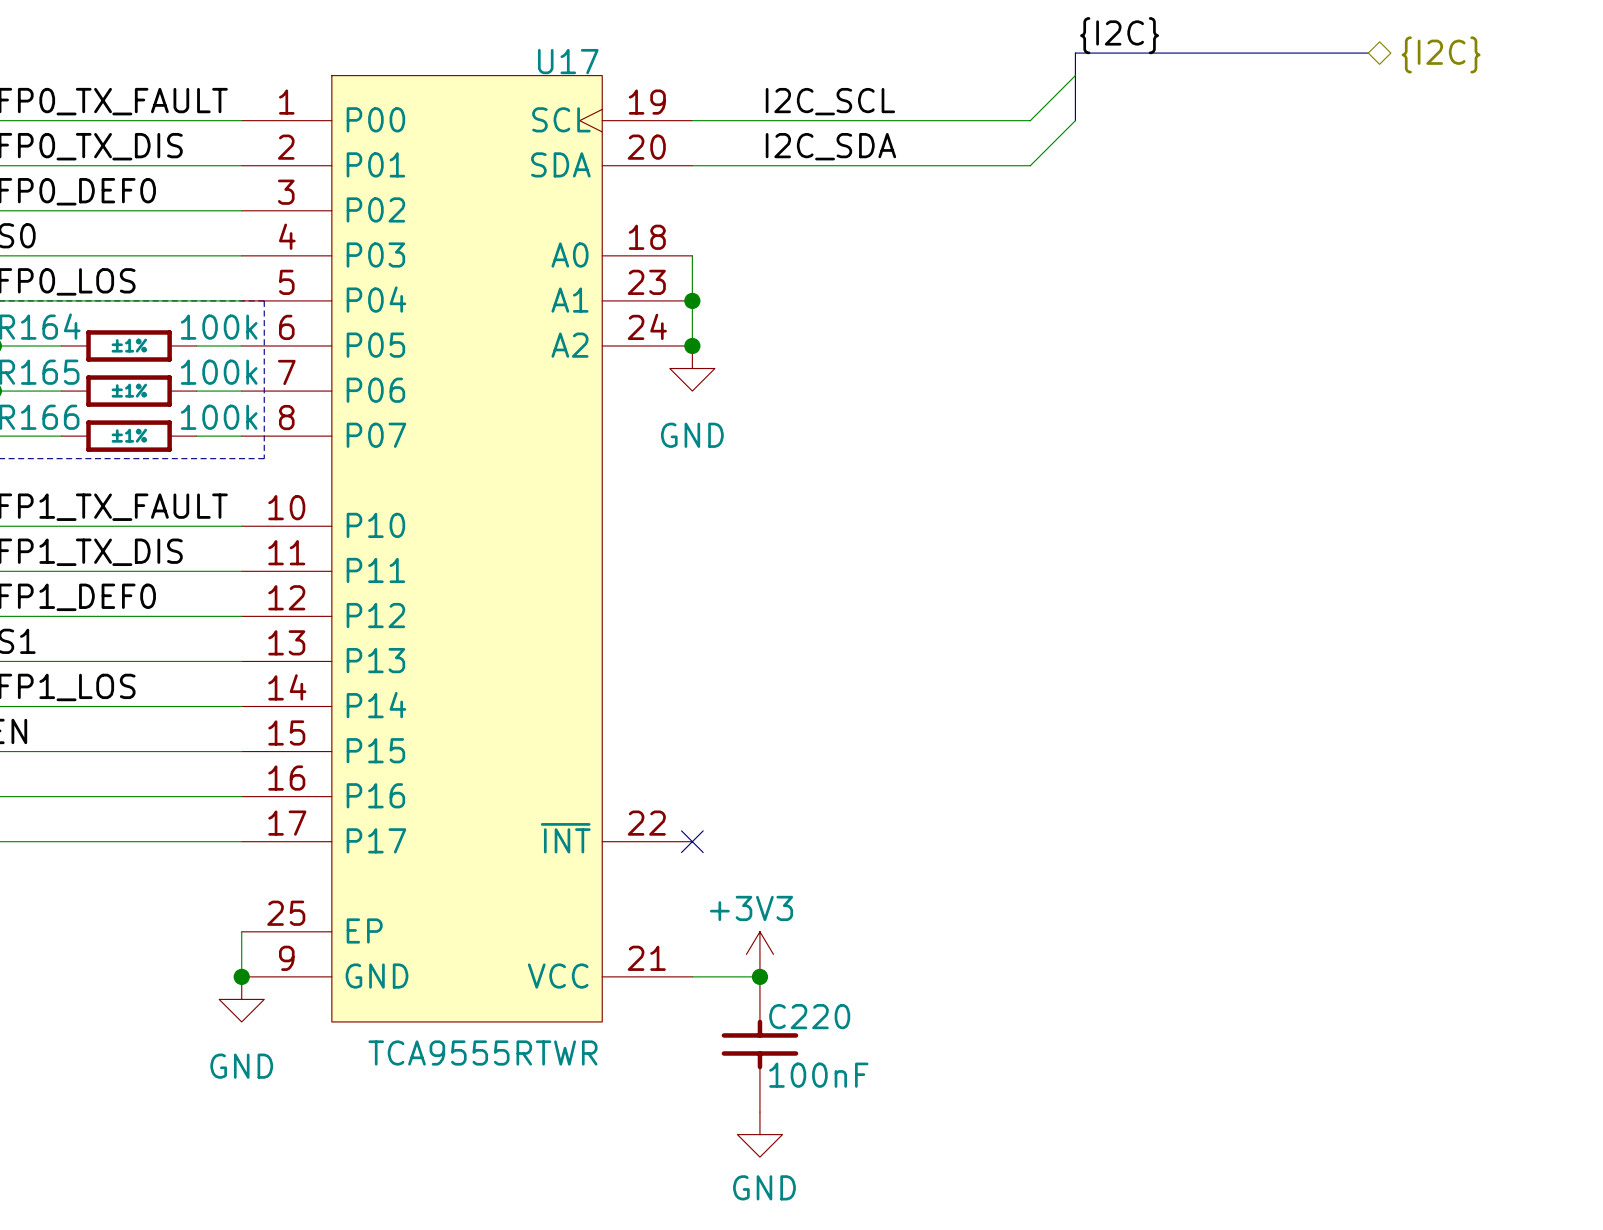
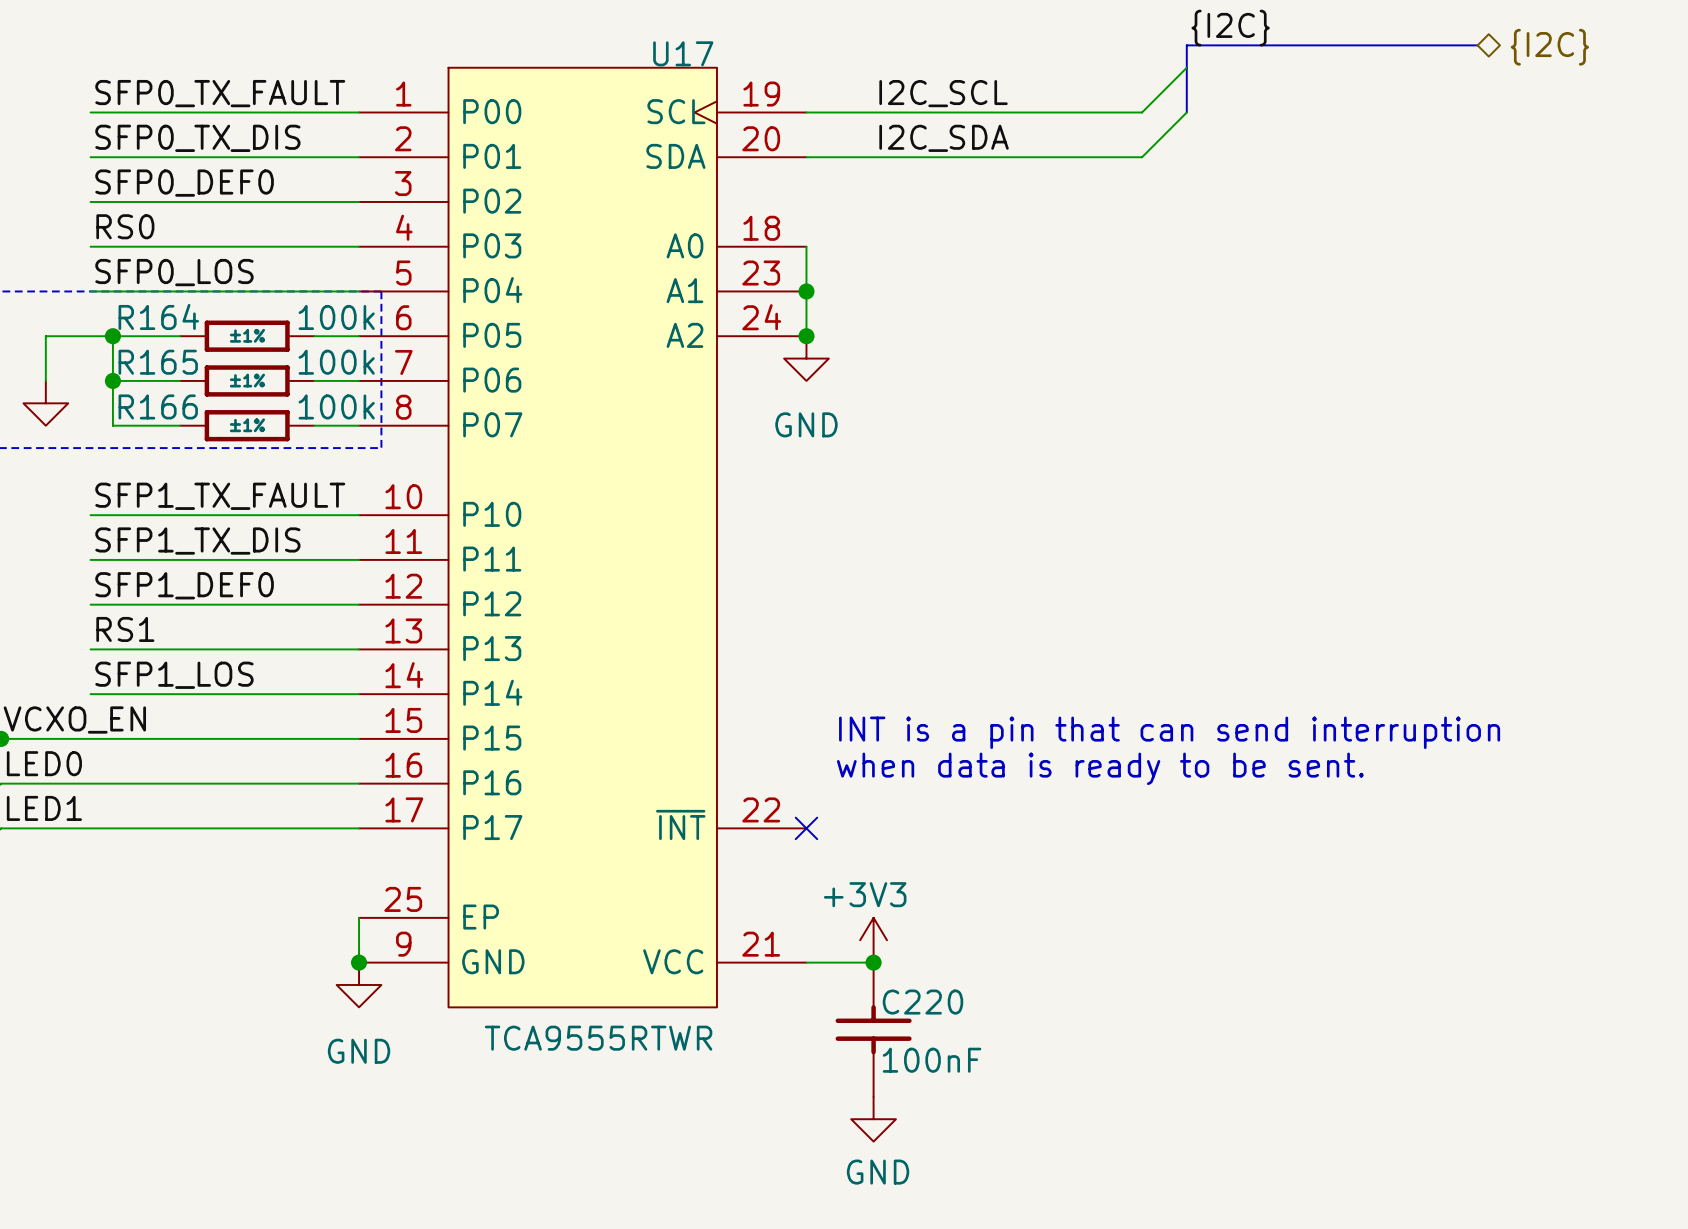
text: none -> INT is a pin that can send interruption (1169, 732)
text: none -> when data is ready to be sent. (1100, 768)

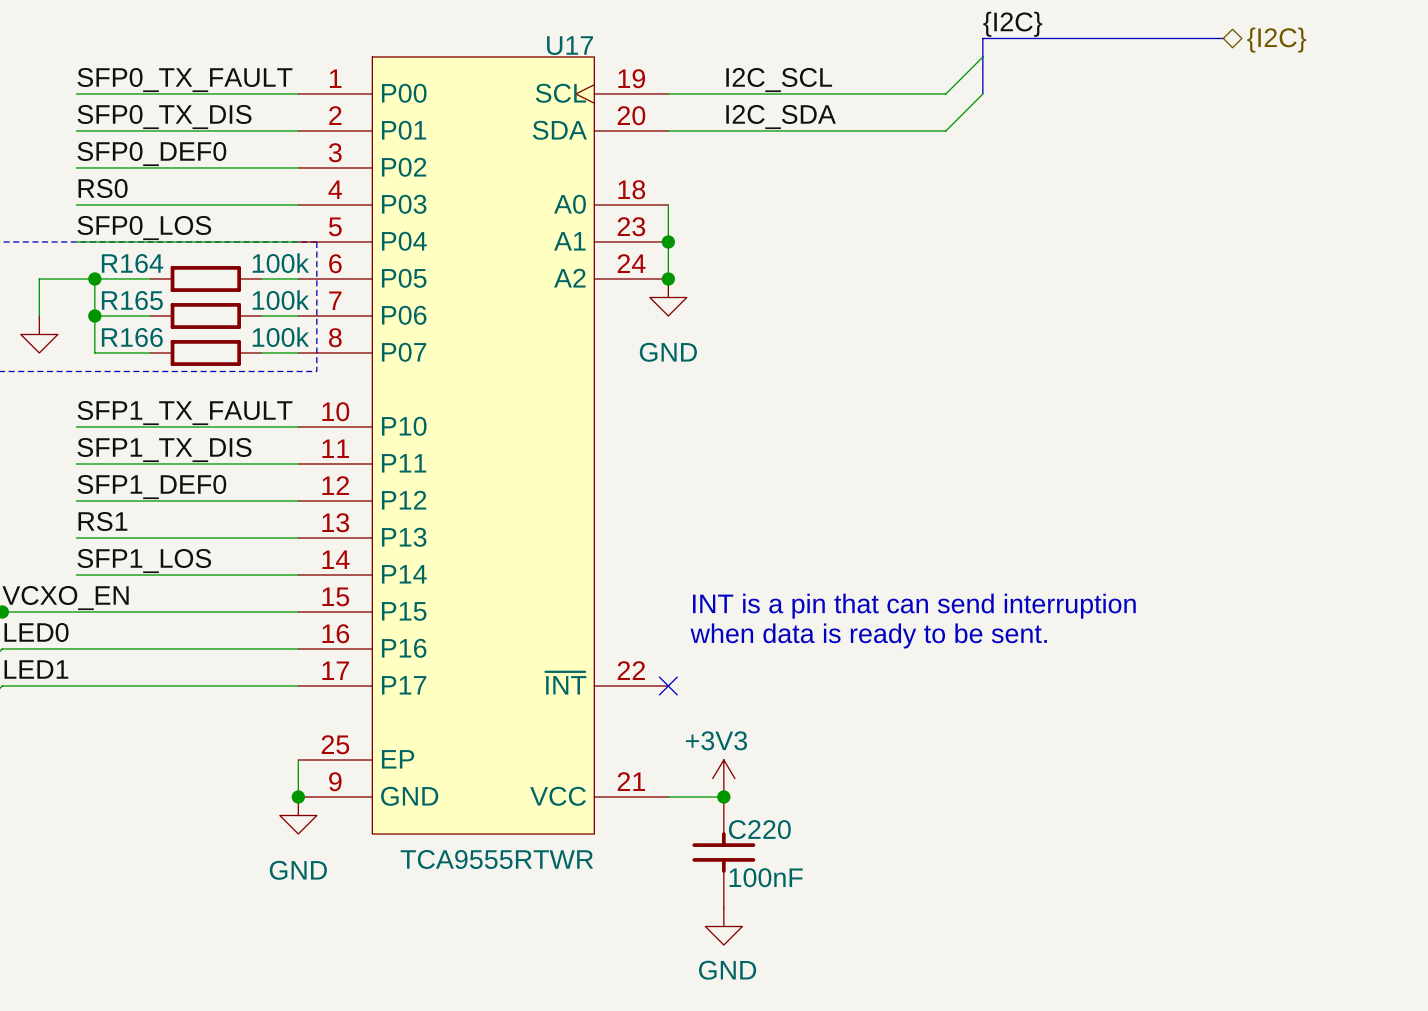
R164 text: ±1% (247, 335) -> none
R165 text: ±1% (247, 380) -> none
R166 text: ±1% (247, 425) -> none

